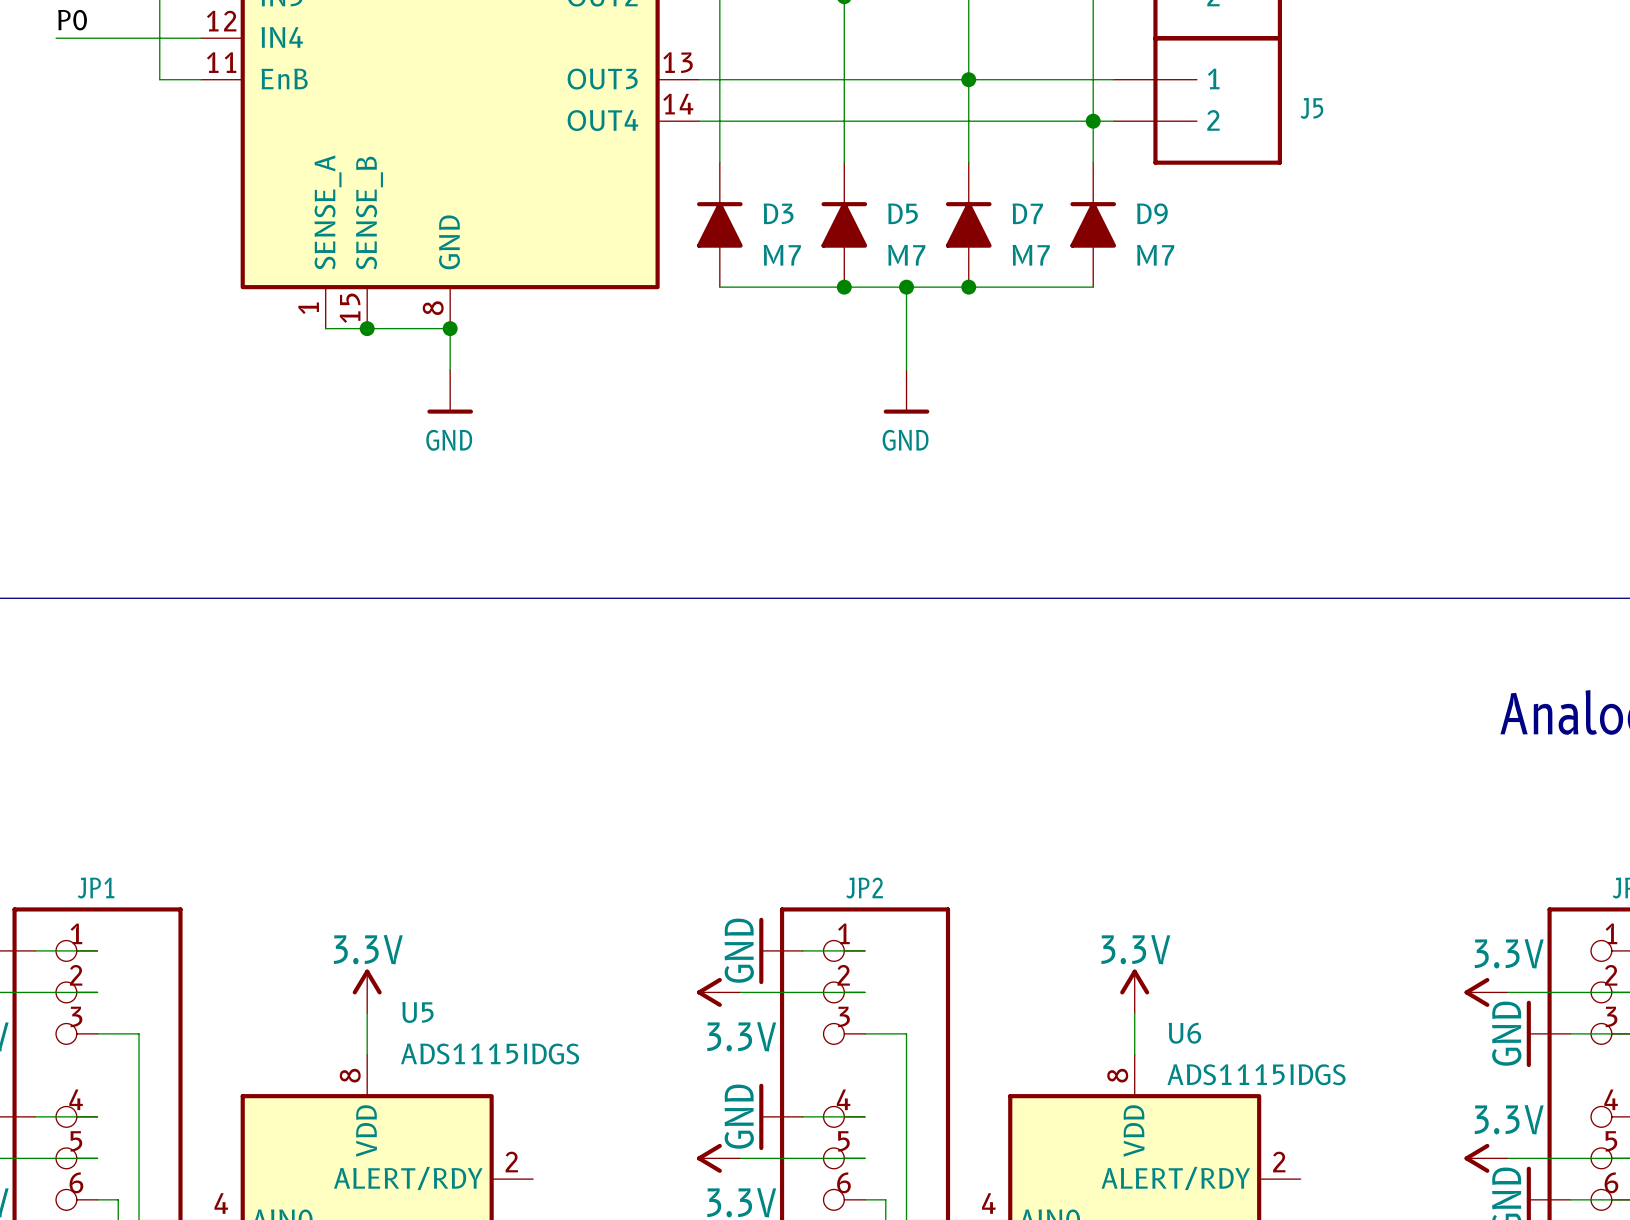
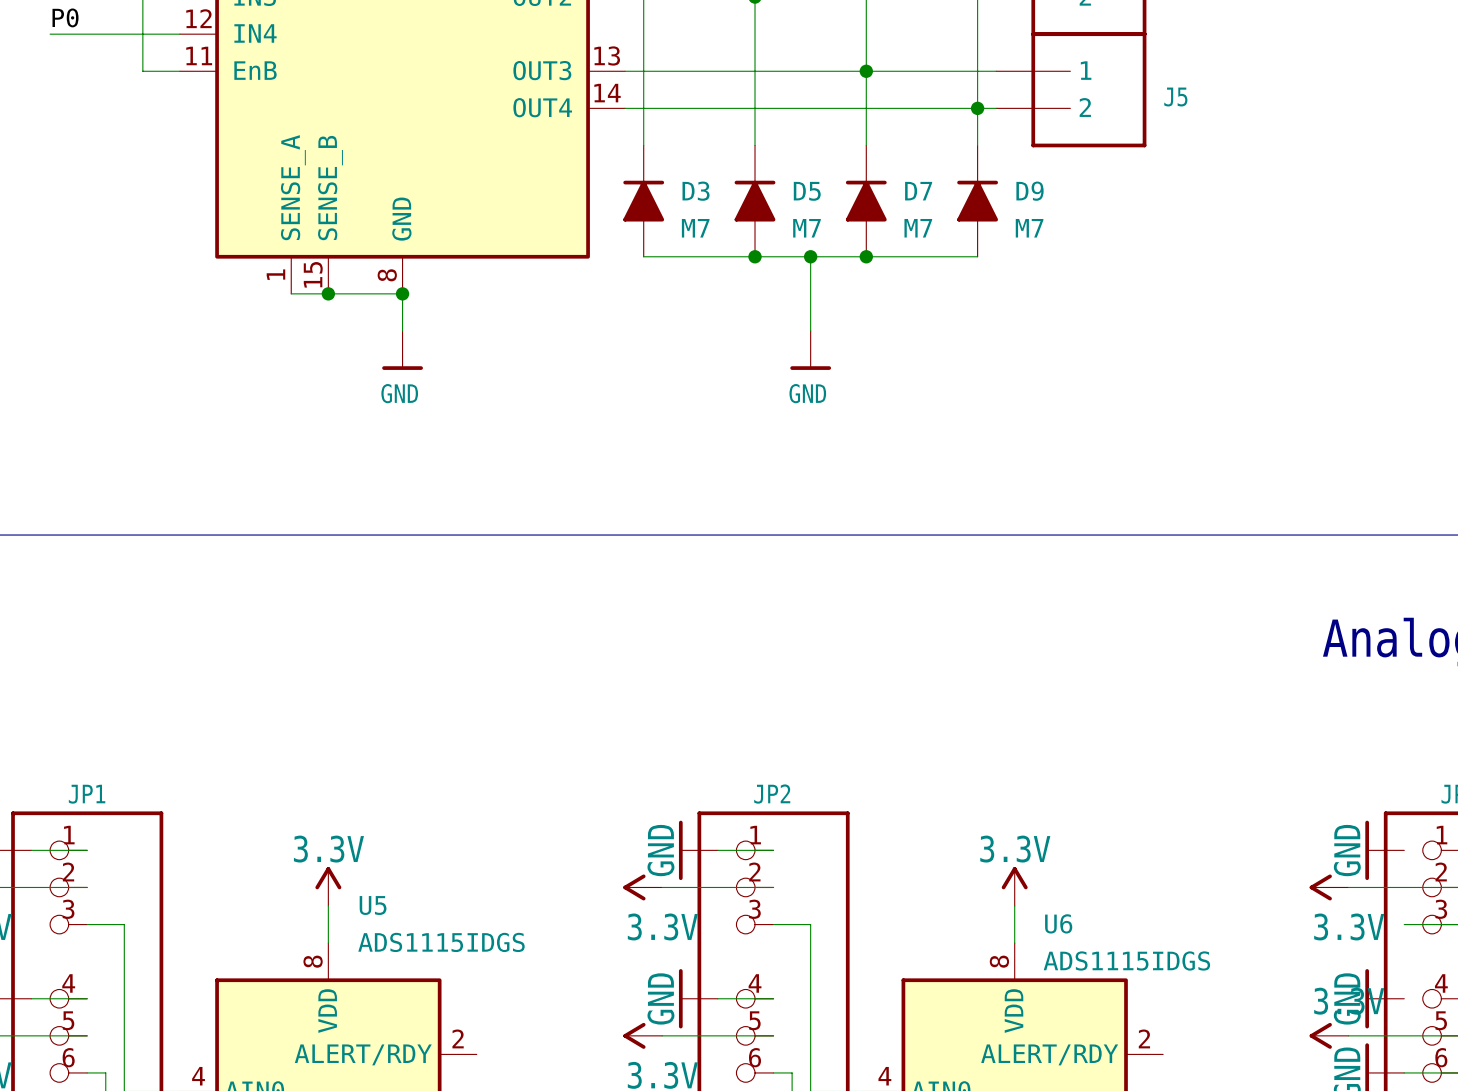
power symbol: none -> GND (1384, 850)
power symbol text position: 3.3V (1509, 953) -> 3.3V (1349, 926)
power symbol: GND (1548, 1033) -> none
power symbol: none -> GND (1384, 998)

